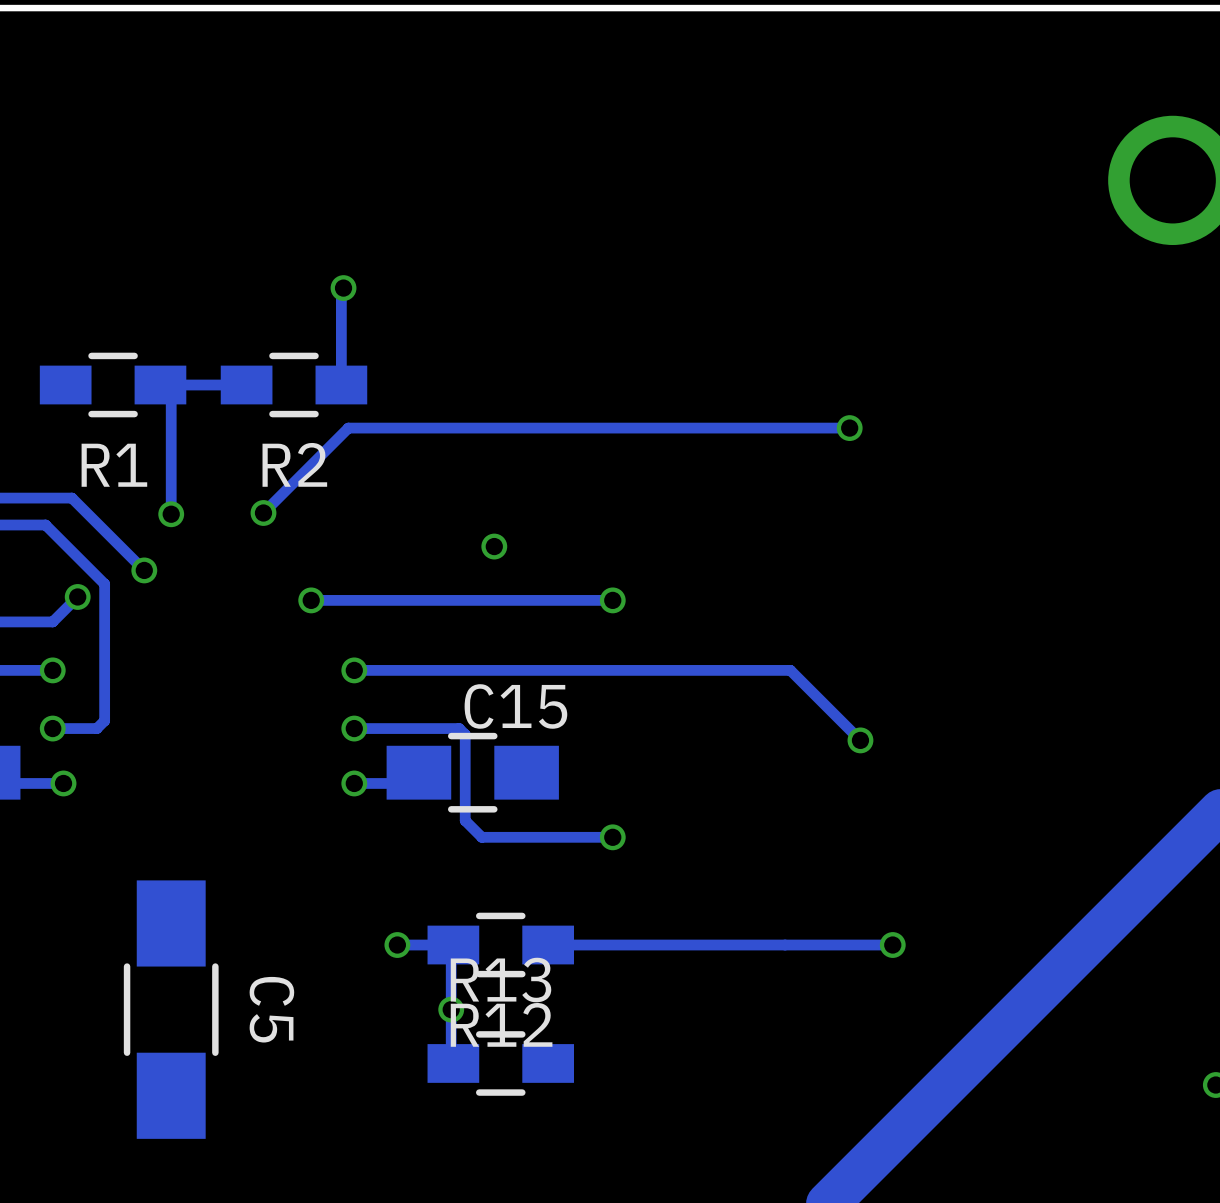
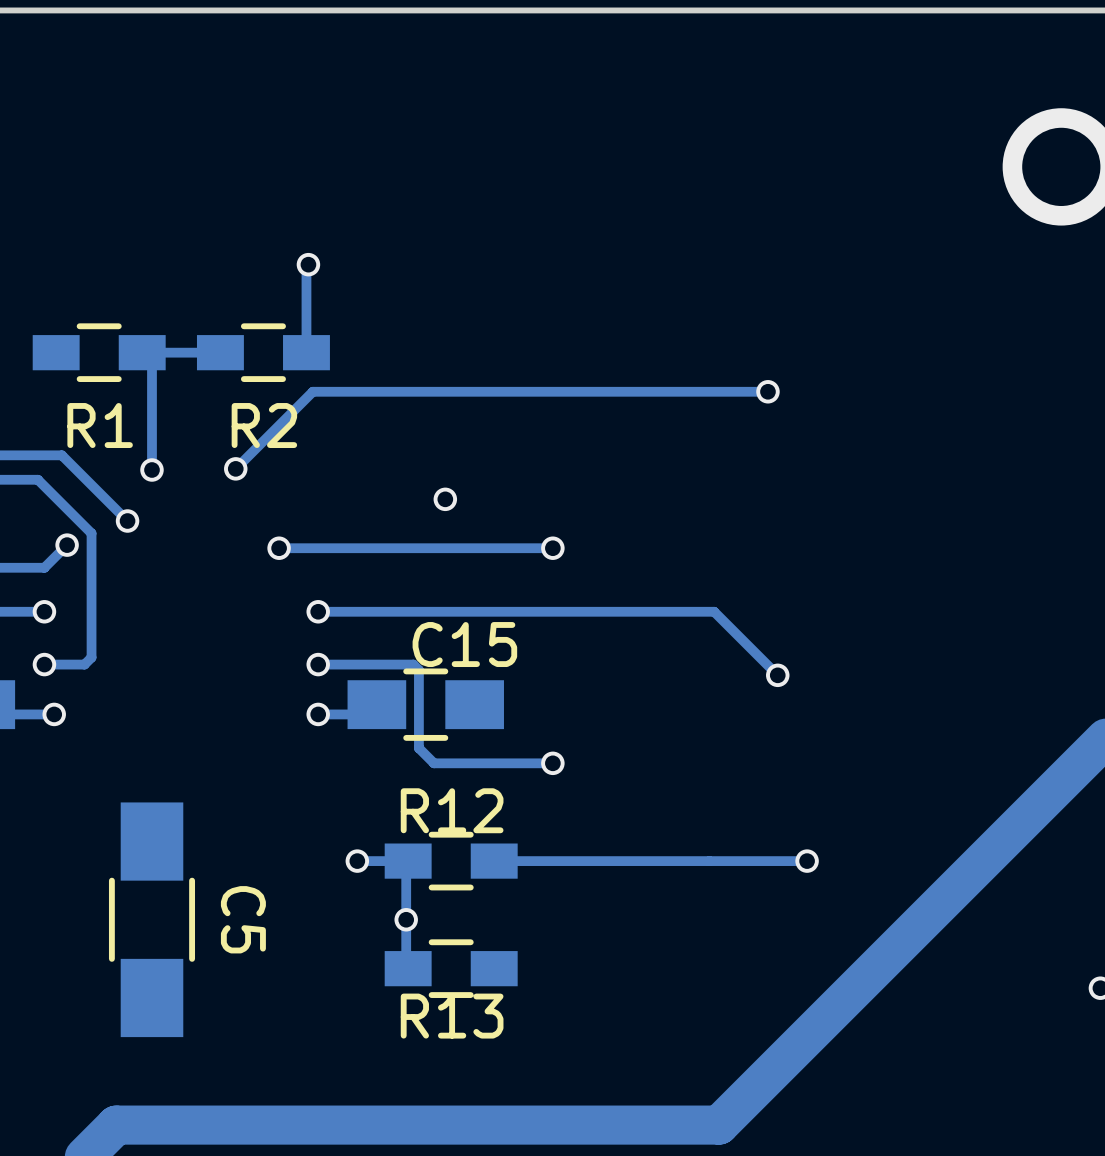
R13 name position: R13 (501, 980) -> R13 (452, 1016)
R12 name position: R12 (501, 1024) -> R12 (452, 810)

